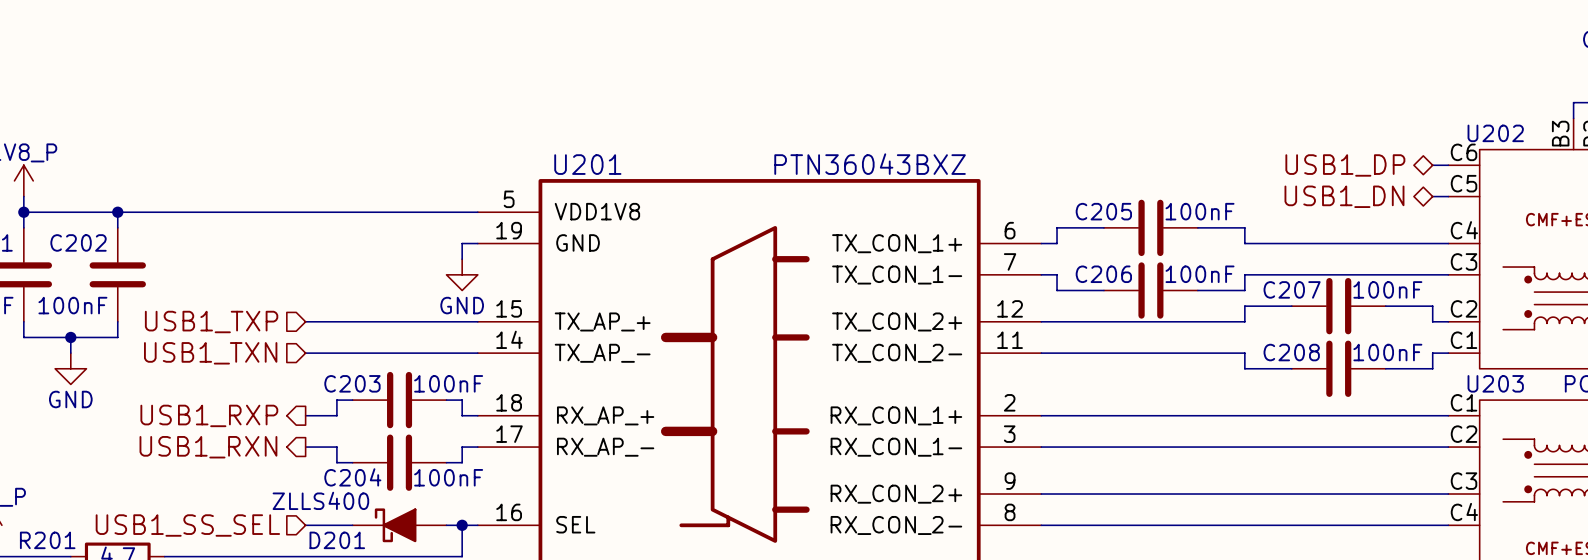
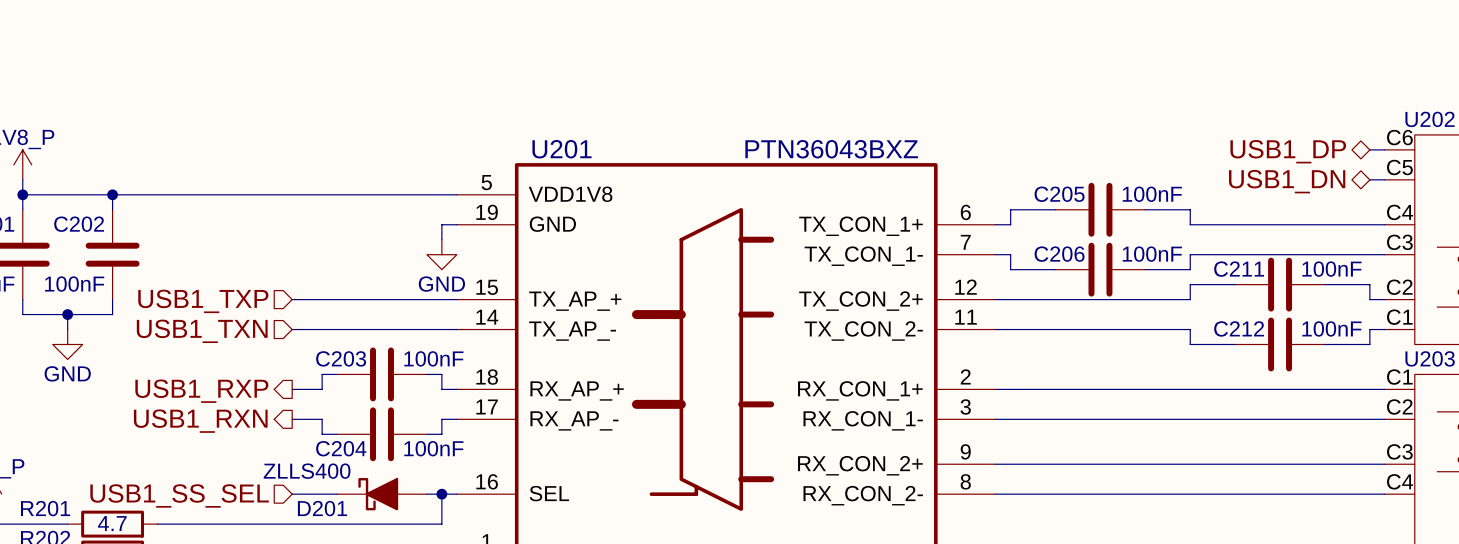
C207 name: C207 (1292, 289) -> C211 (1239, 269)
C208 name: C208 (1291, 352) -> C212 (1239, 328)

